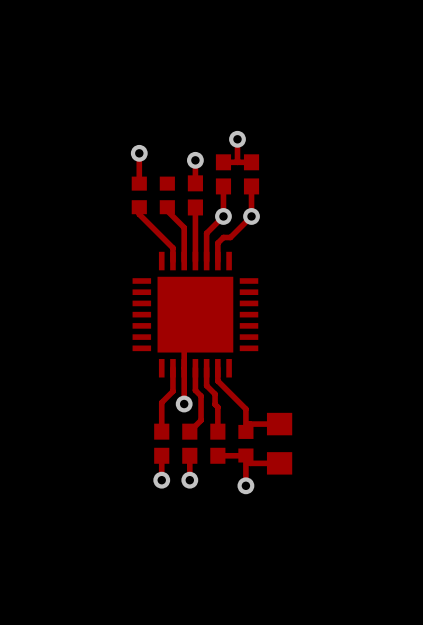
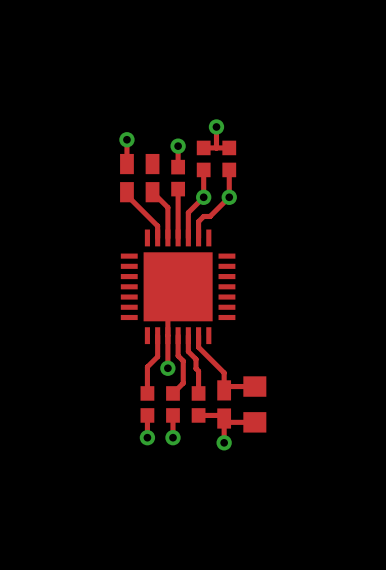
part footprint: [131, 176, 147, 215] -> [120, 153, 134, 203]
part footprint: [159, 176, 175, 215] -> [145, 153, 160, 203]
part footprint: [238, 424, 254, 463] -> [217, 380, 232, 429]

